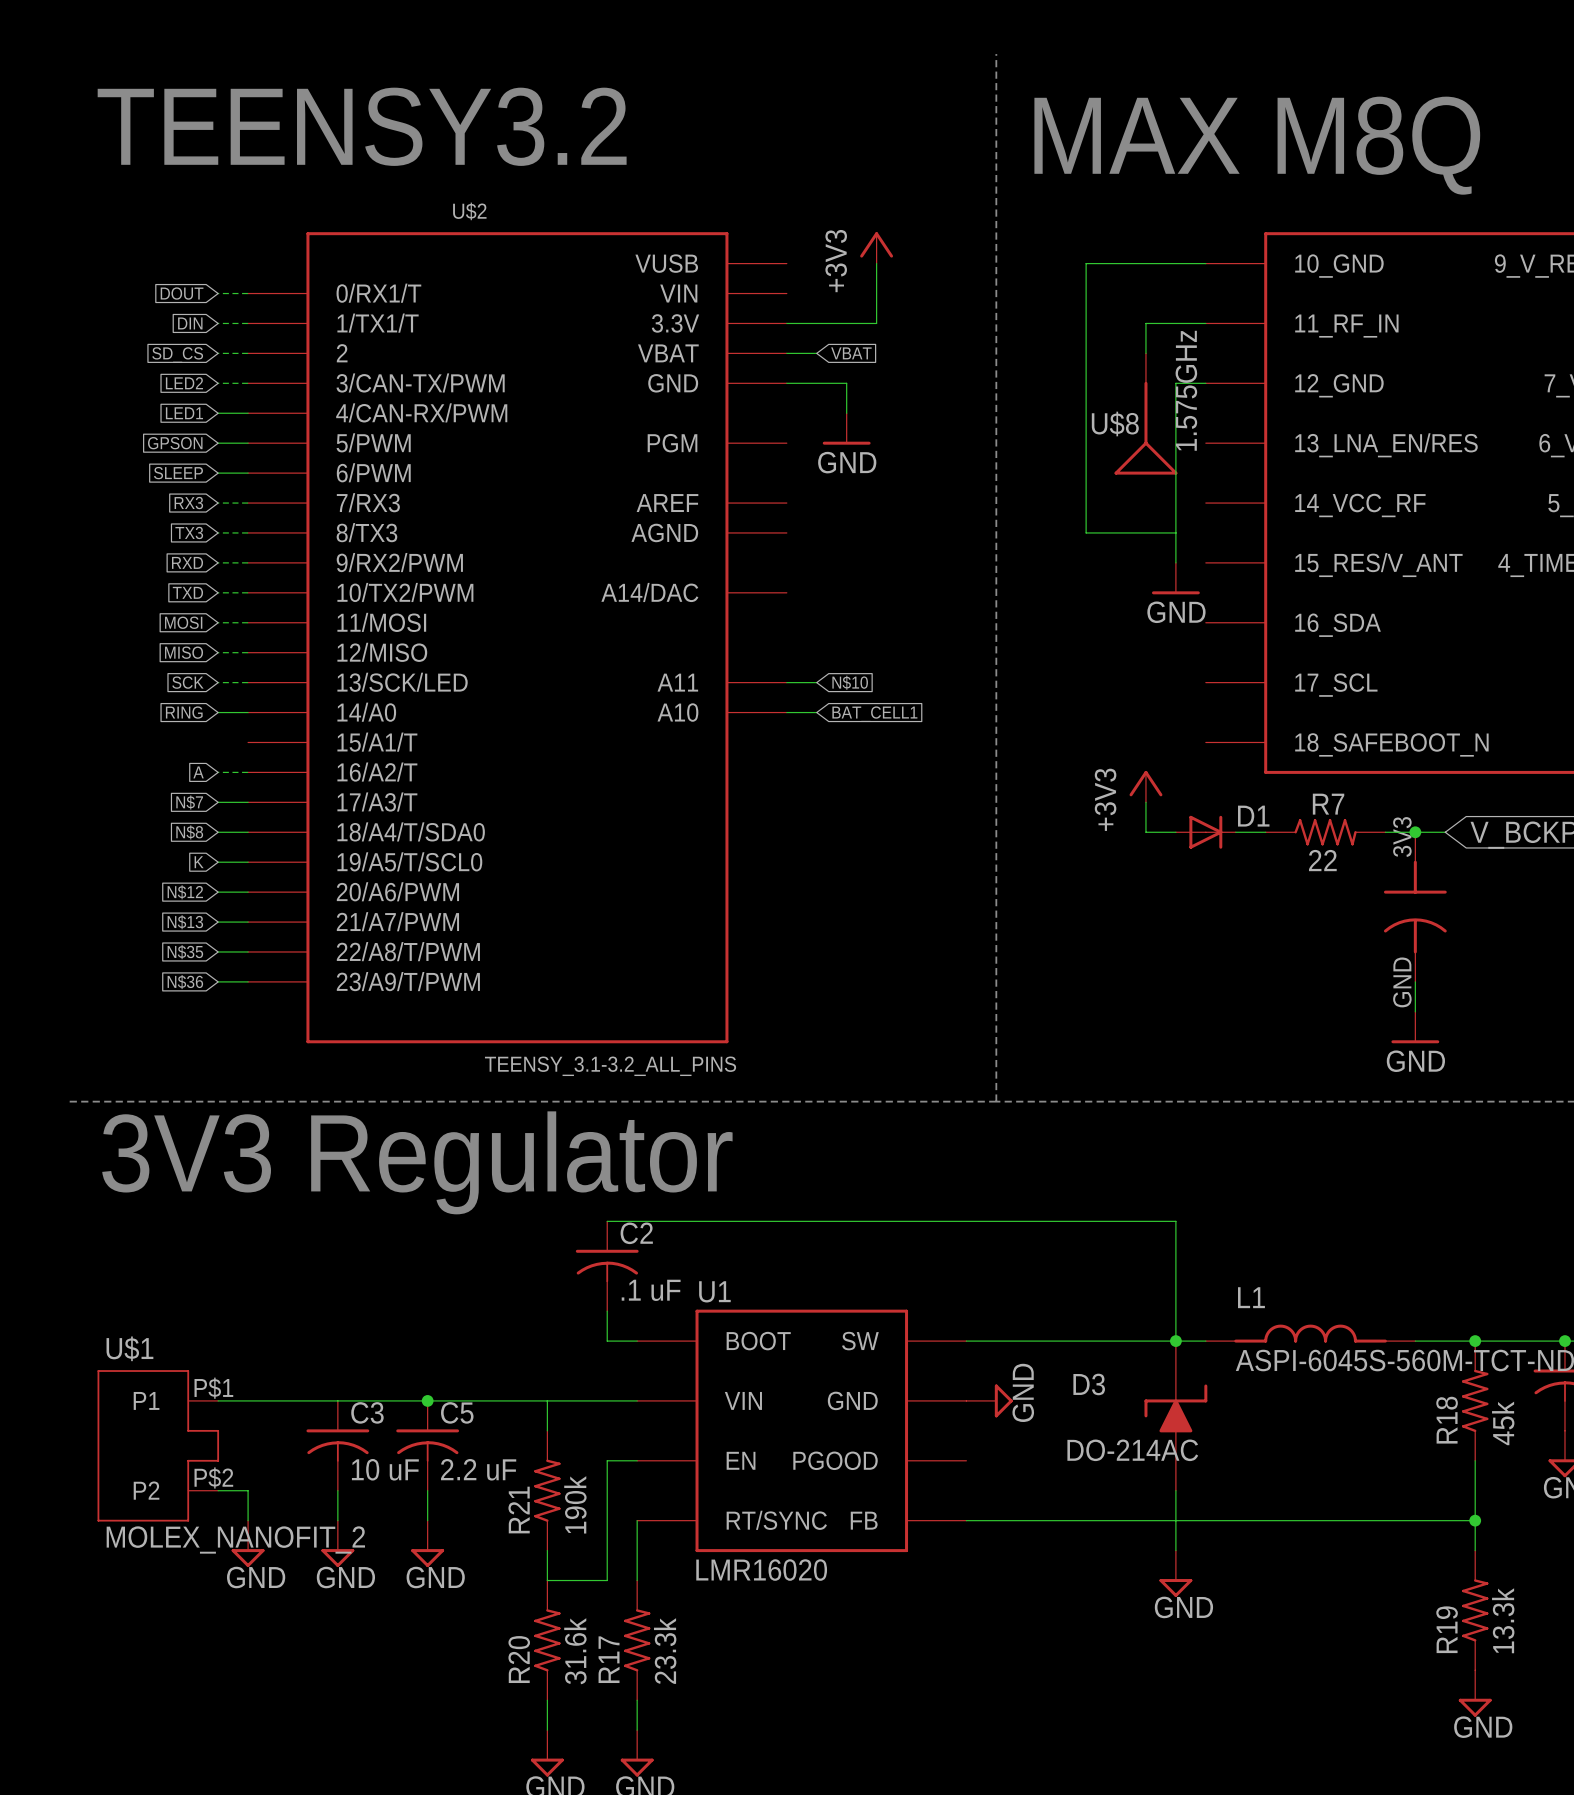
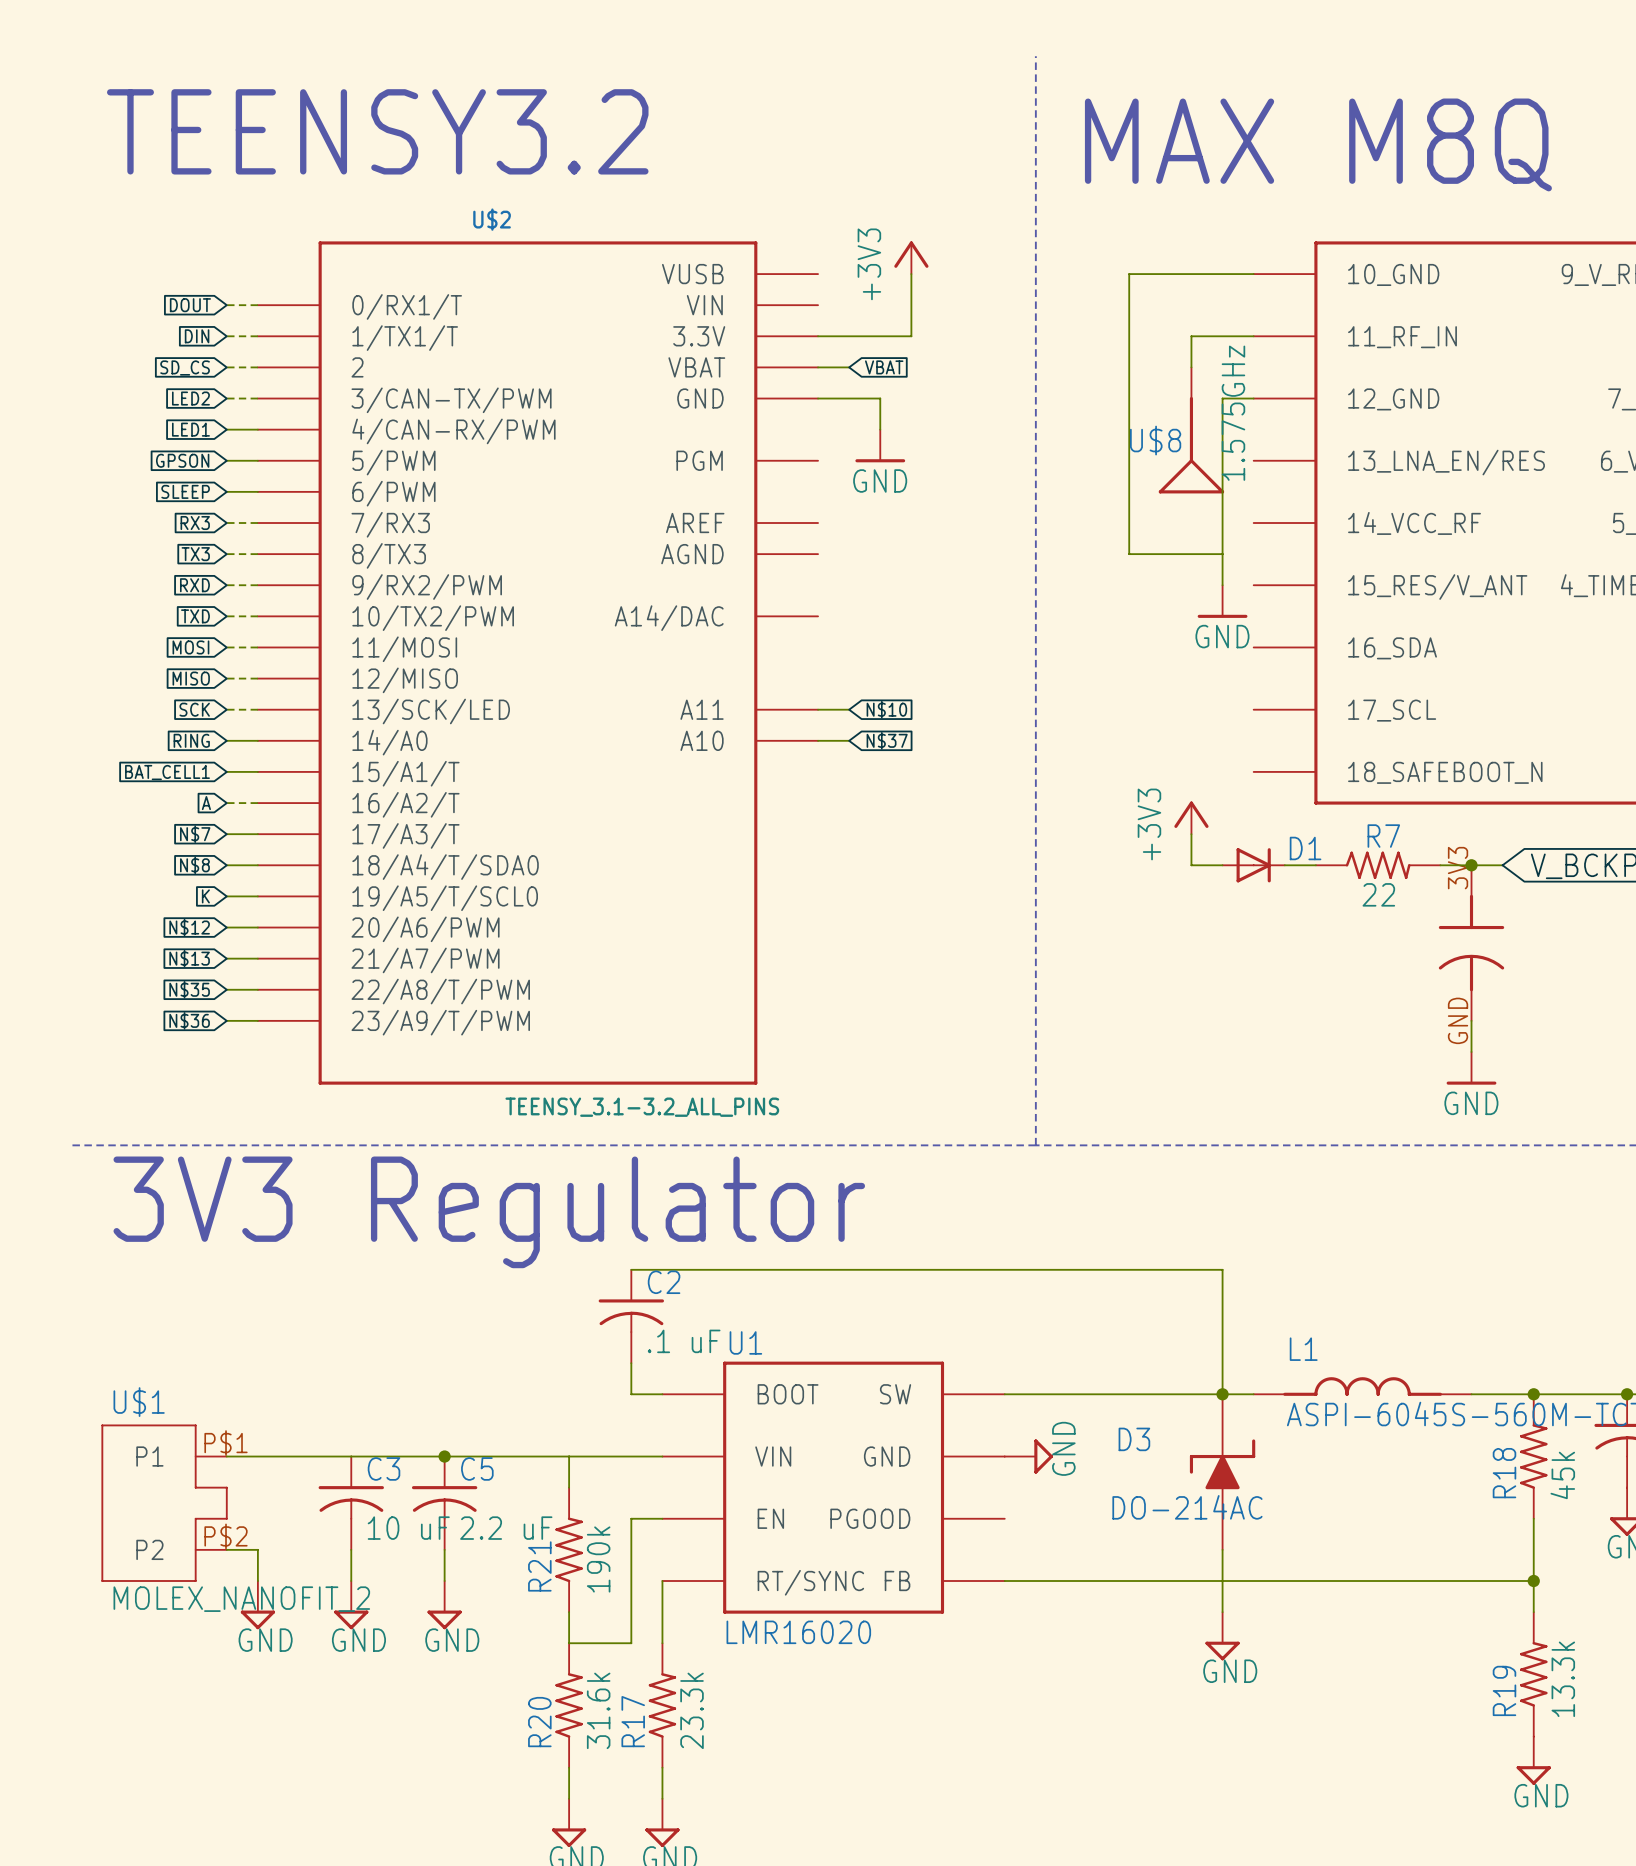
global label: BAT_CELL1 (874, 714) -> N$37 (887, 740)
wire: none -> (226, 771) (257, 771)
global label: none -> BAT_CELL1 (167, 772)

